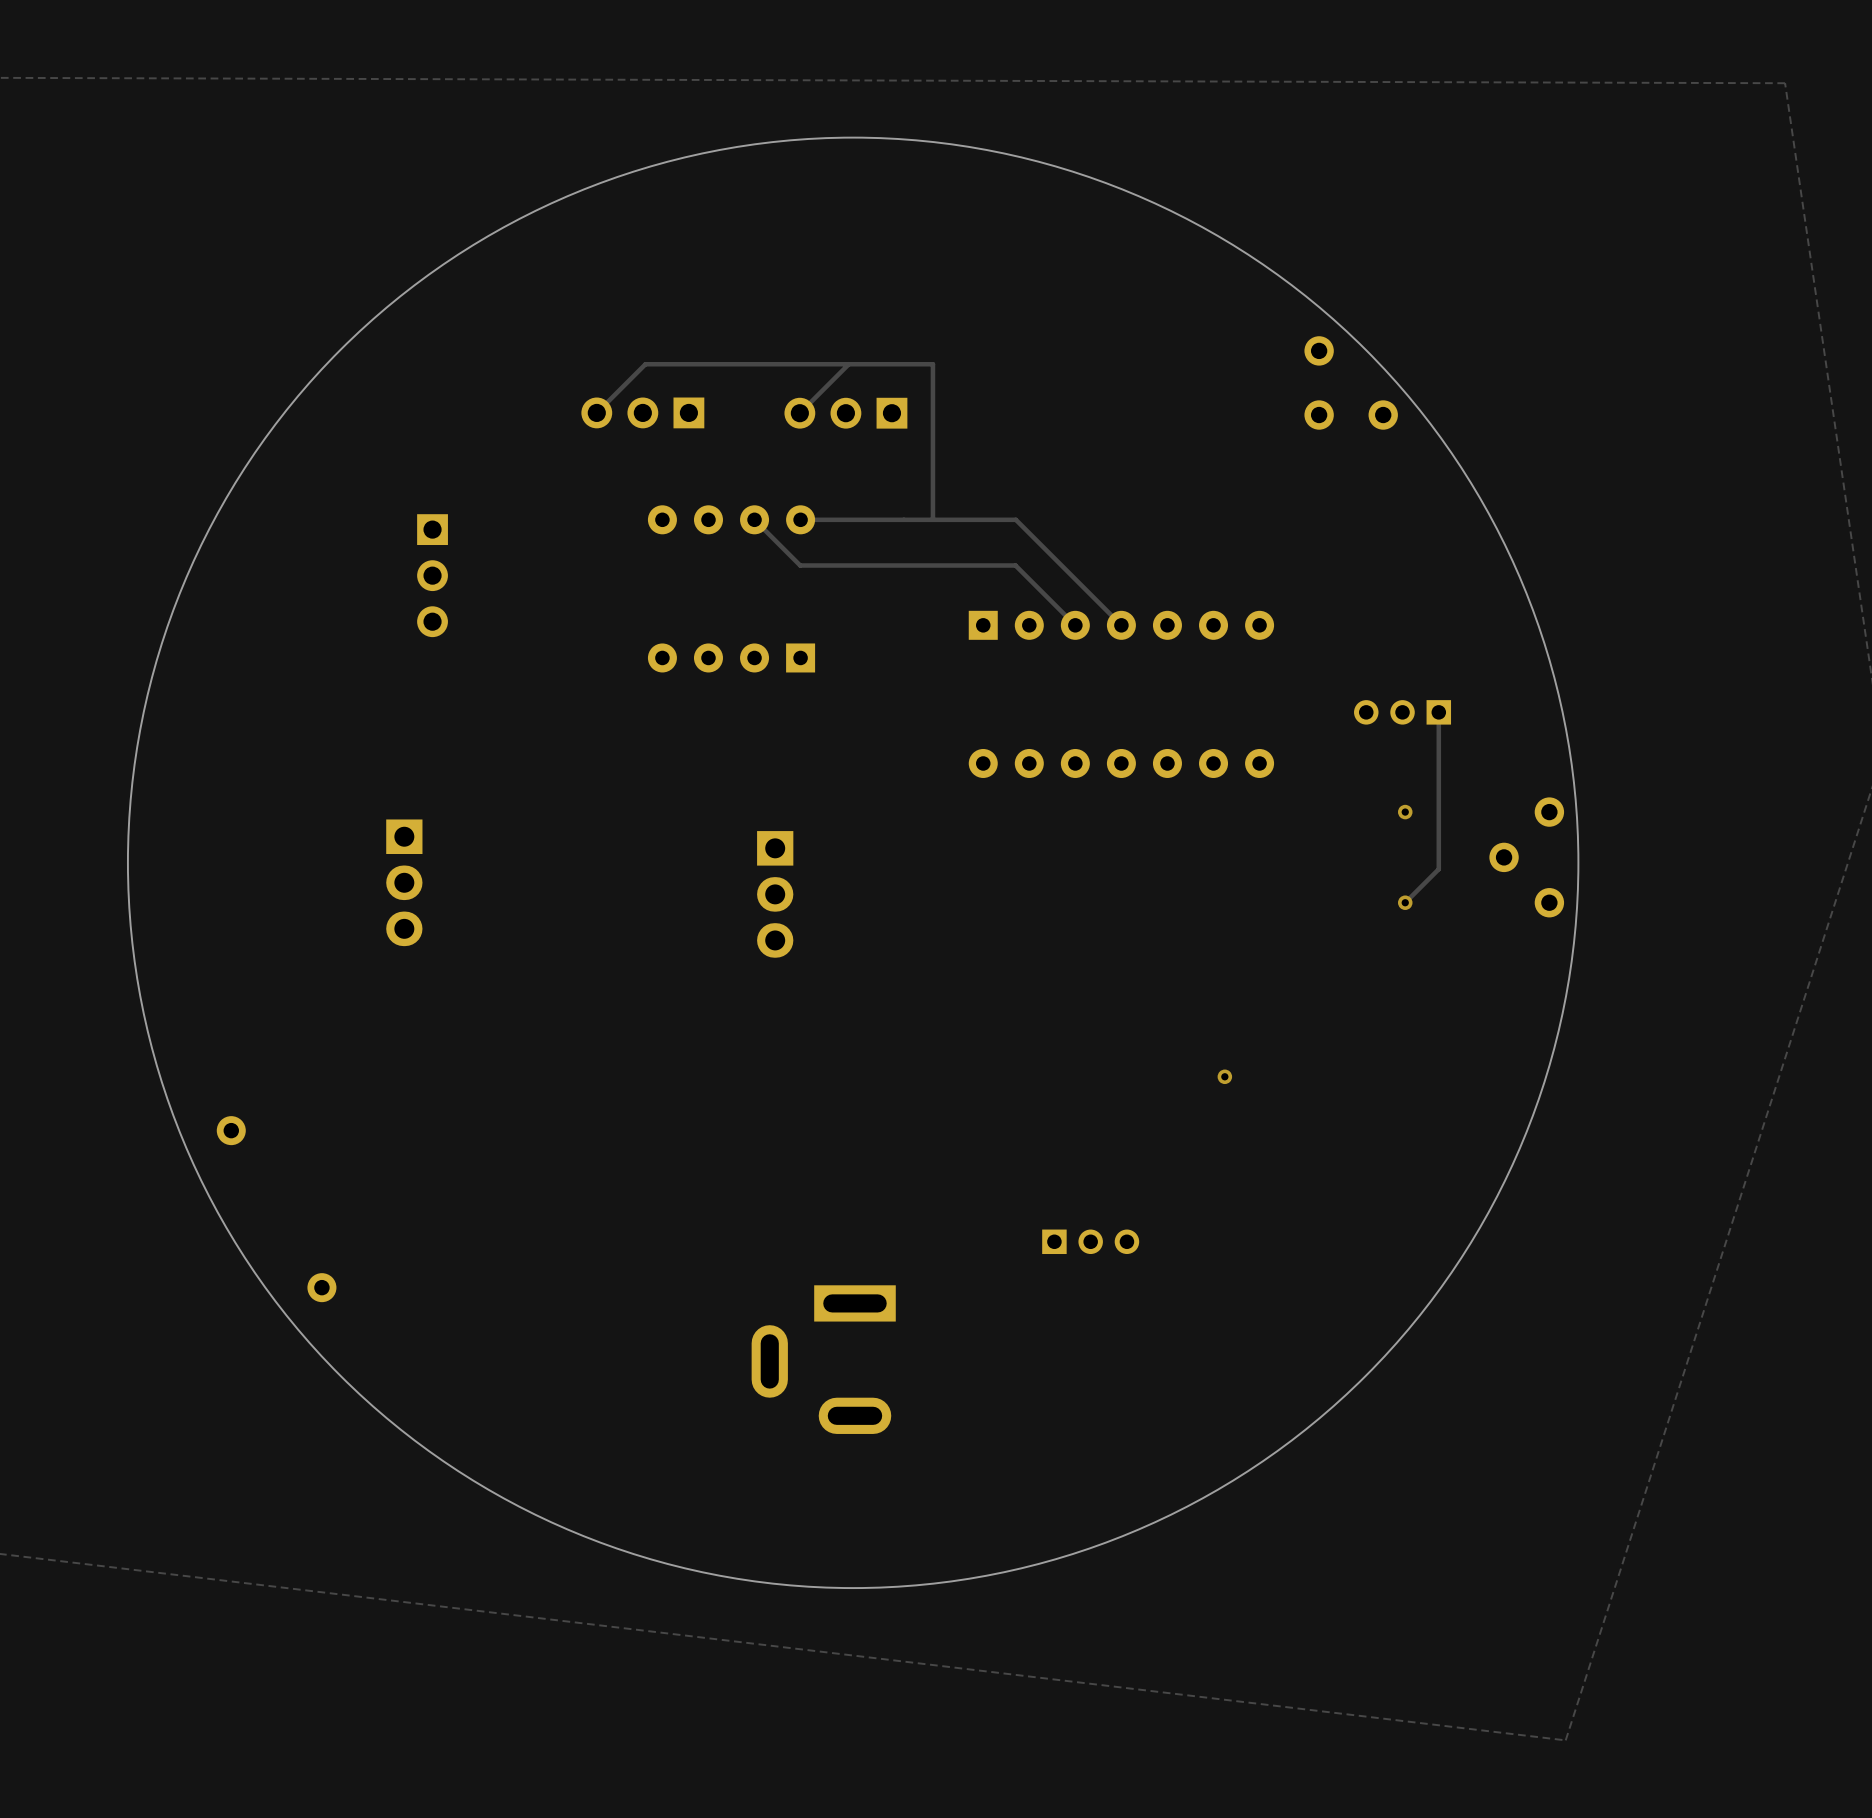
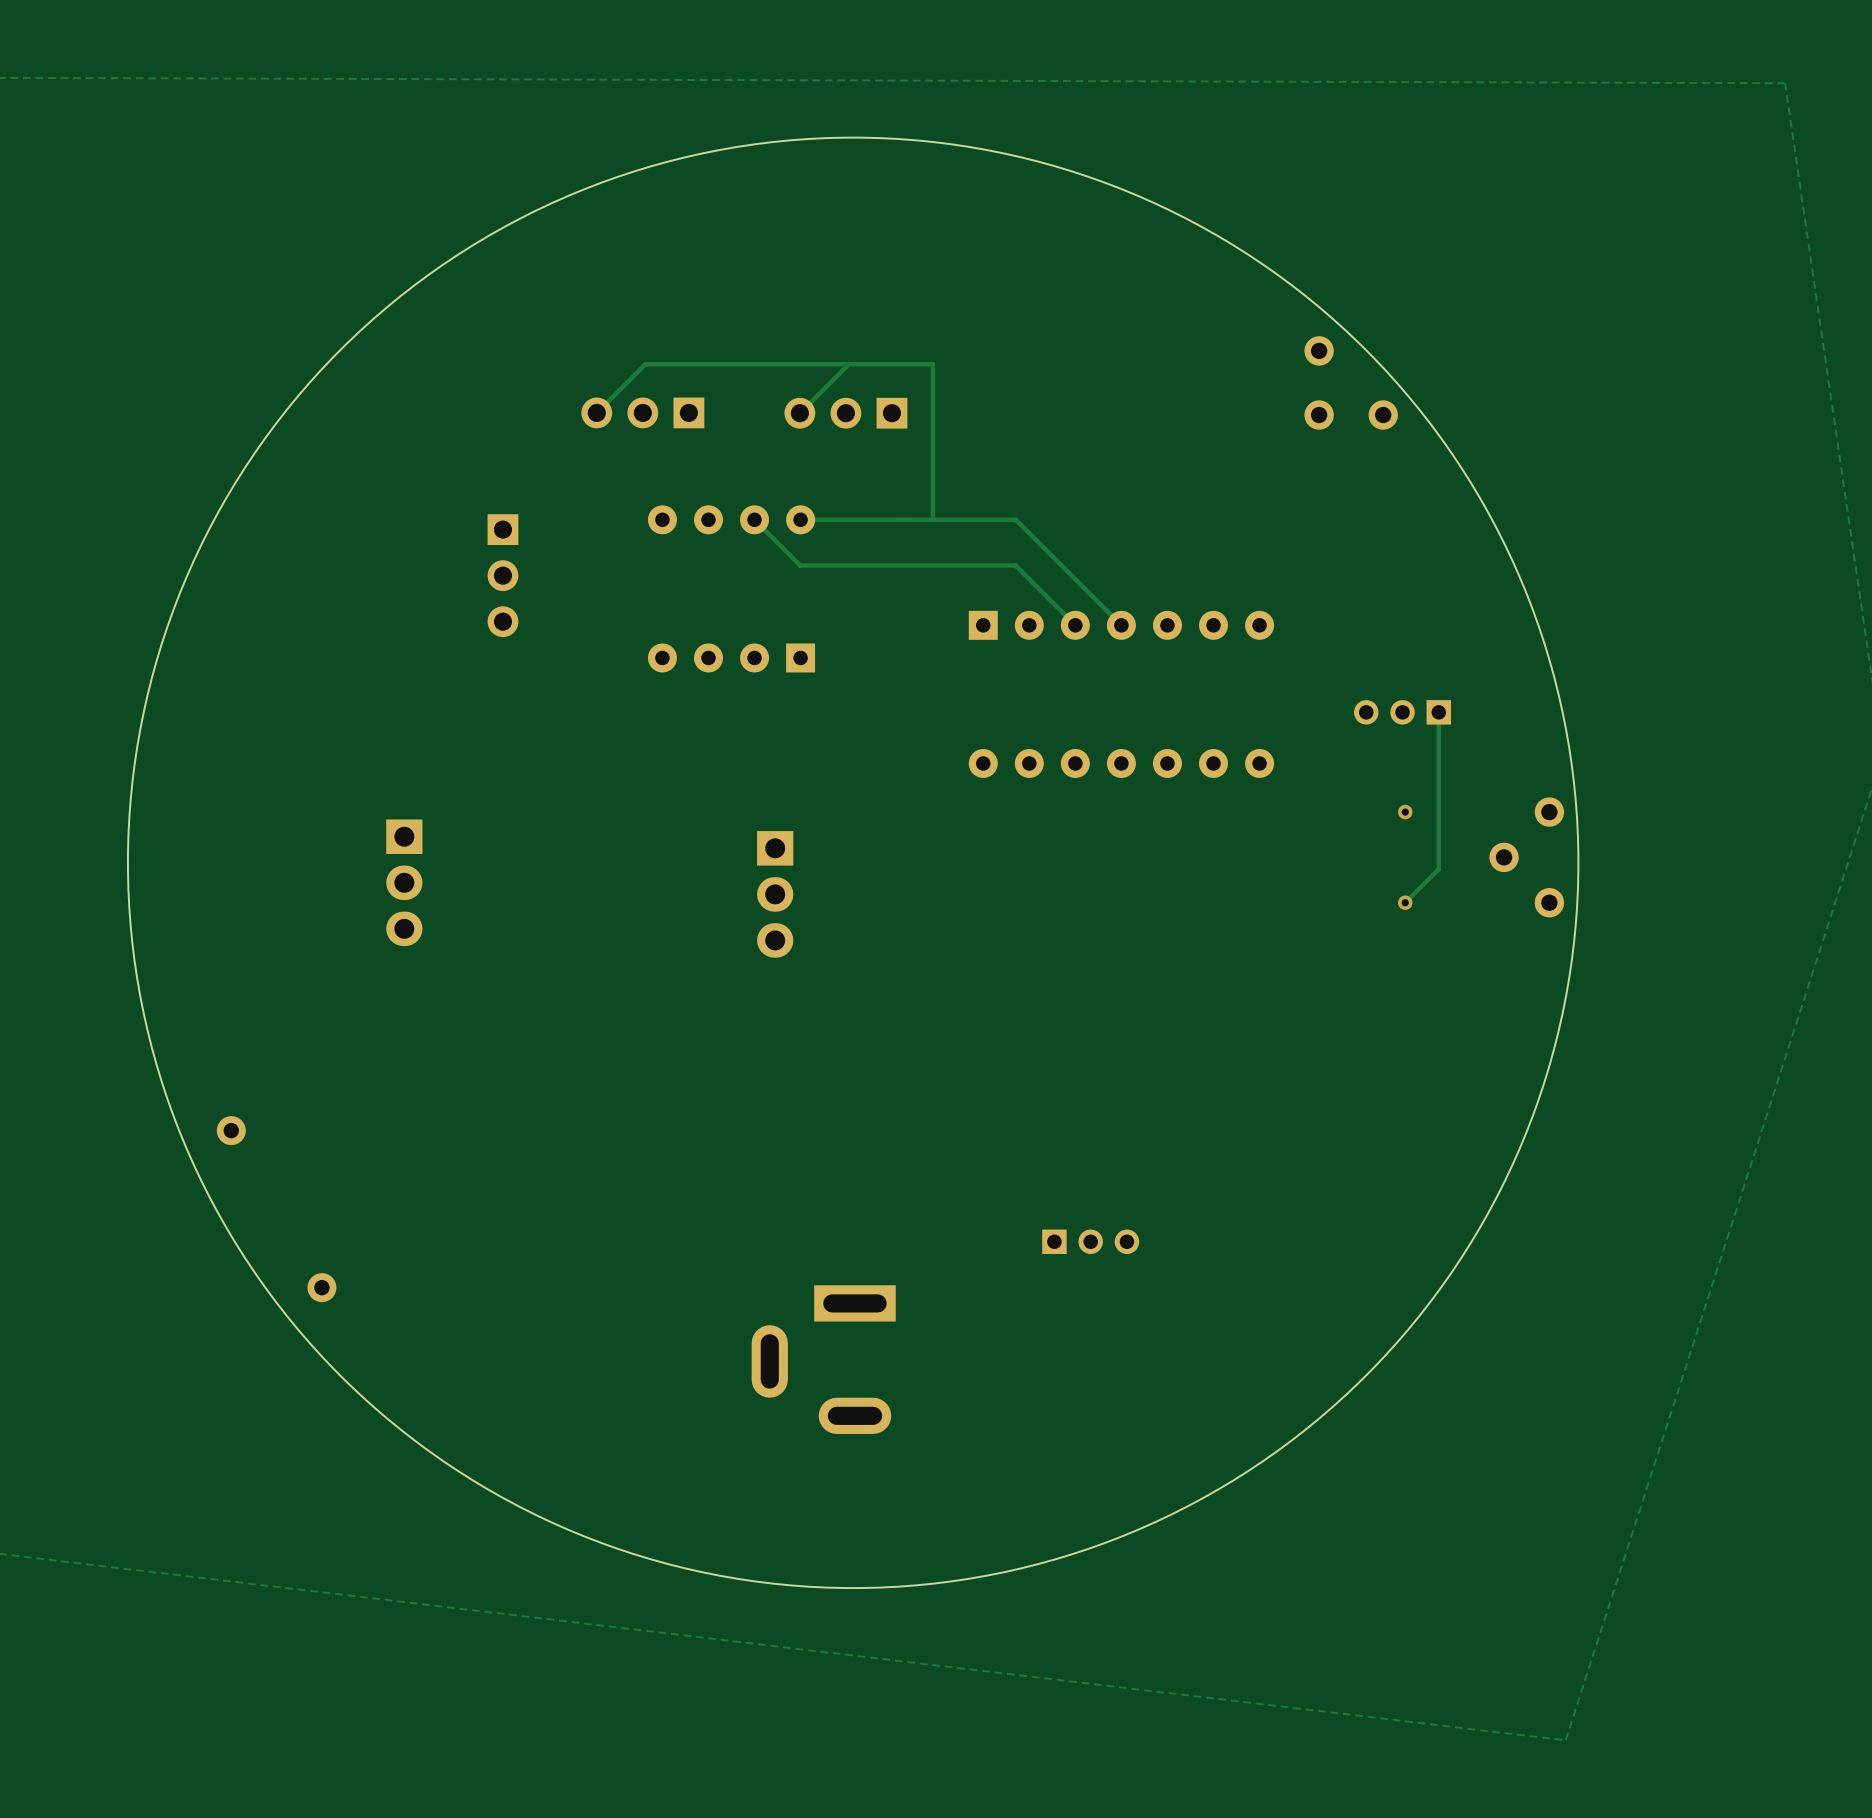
part position: (432, 575) -> (502, 575)
via: (1224, 1076) -> none

